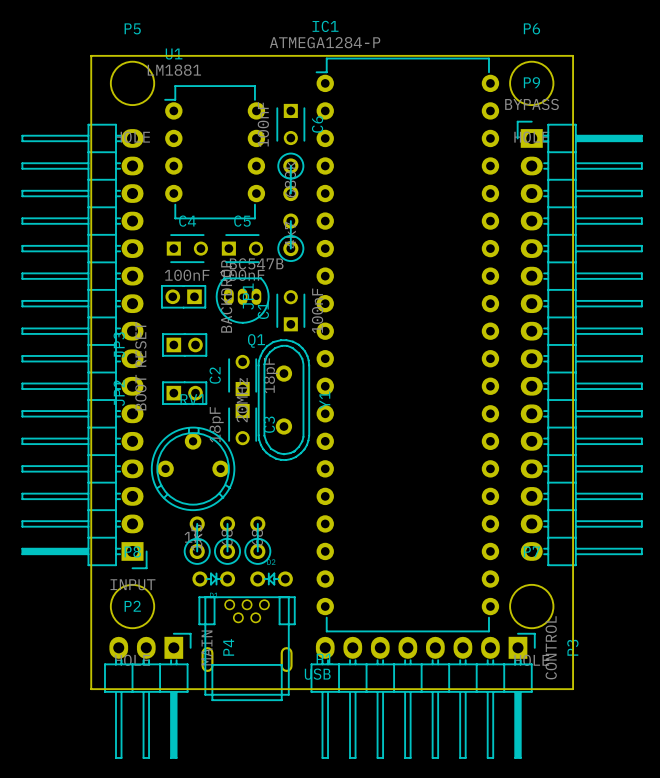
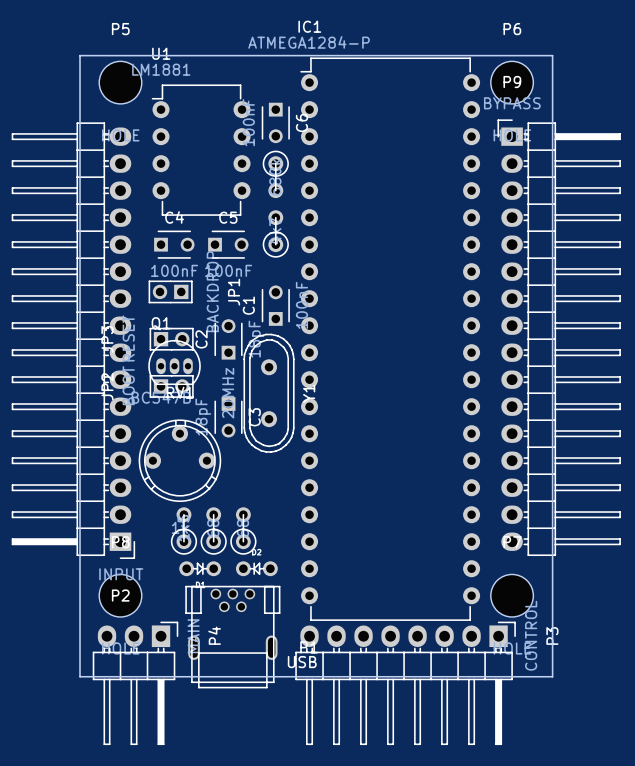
Q1 rotation: 0° (242, 300) -> 180° (174, 362)
Q1 position: (242, 300) -> (174, 362)
C2 position: (242, 375) -> (228, 339)

